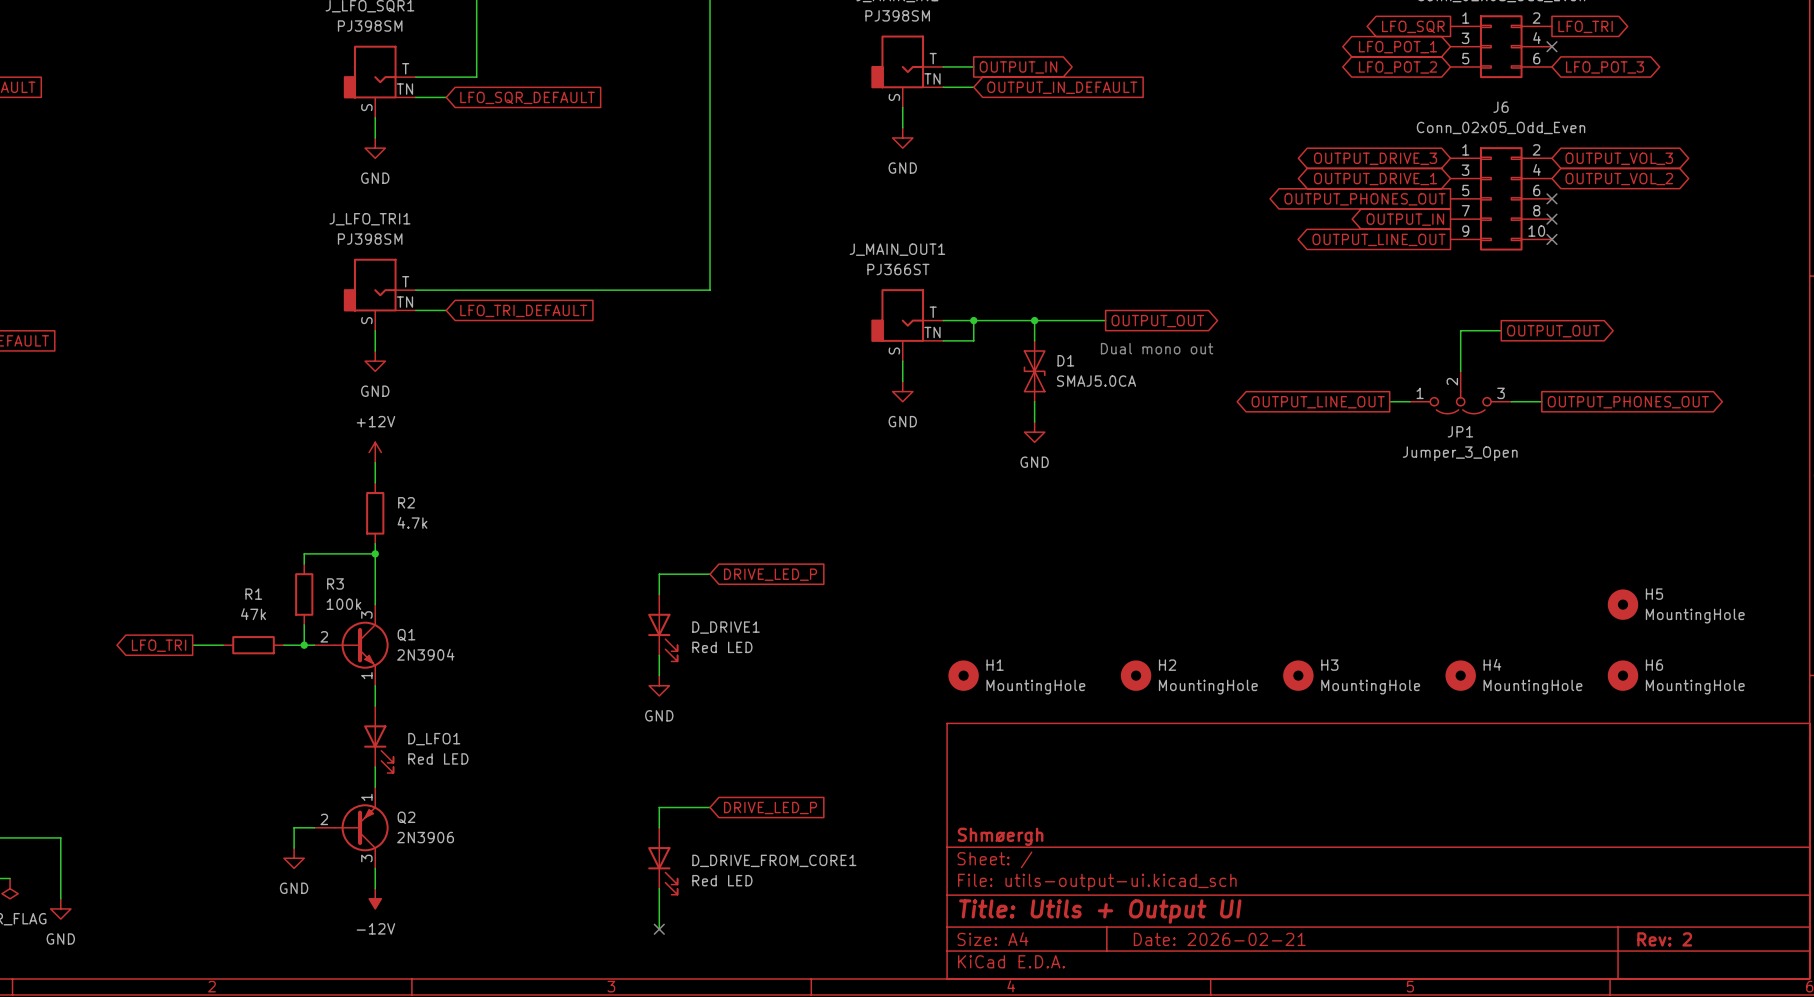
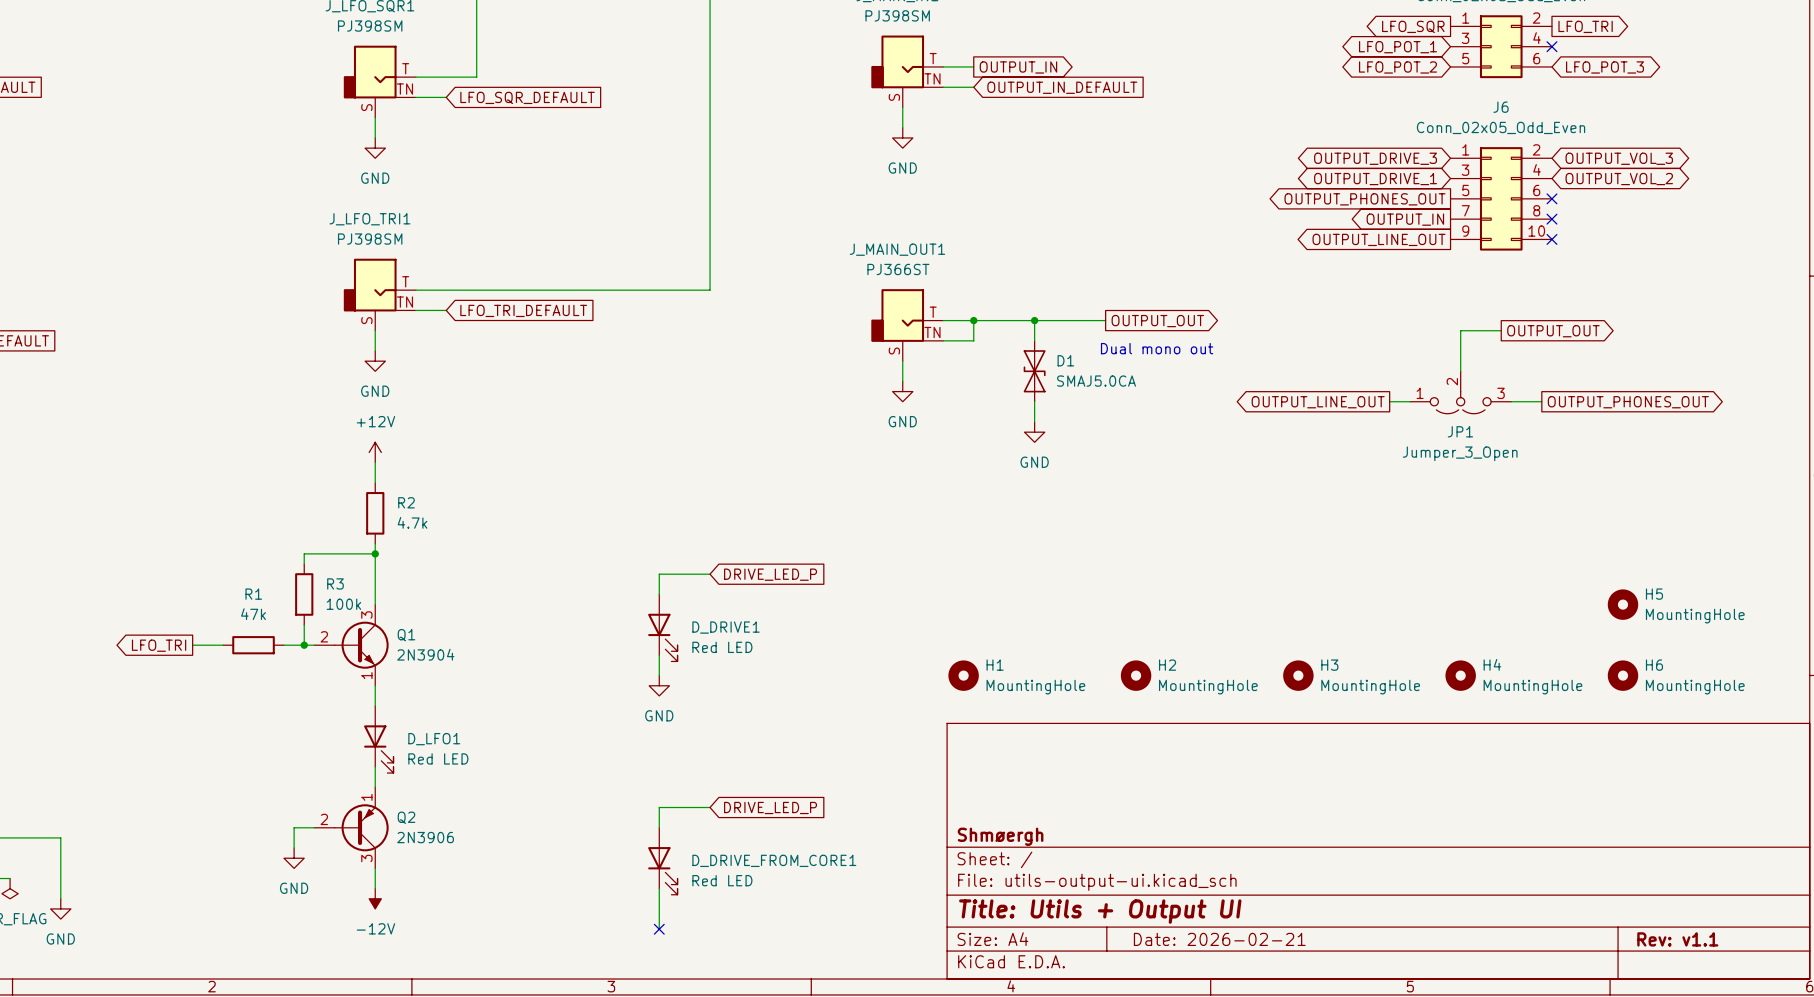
title block: Rev: 2 (1664, 939) -> Rev: v1.1 (1677, 939)

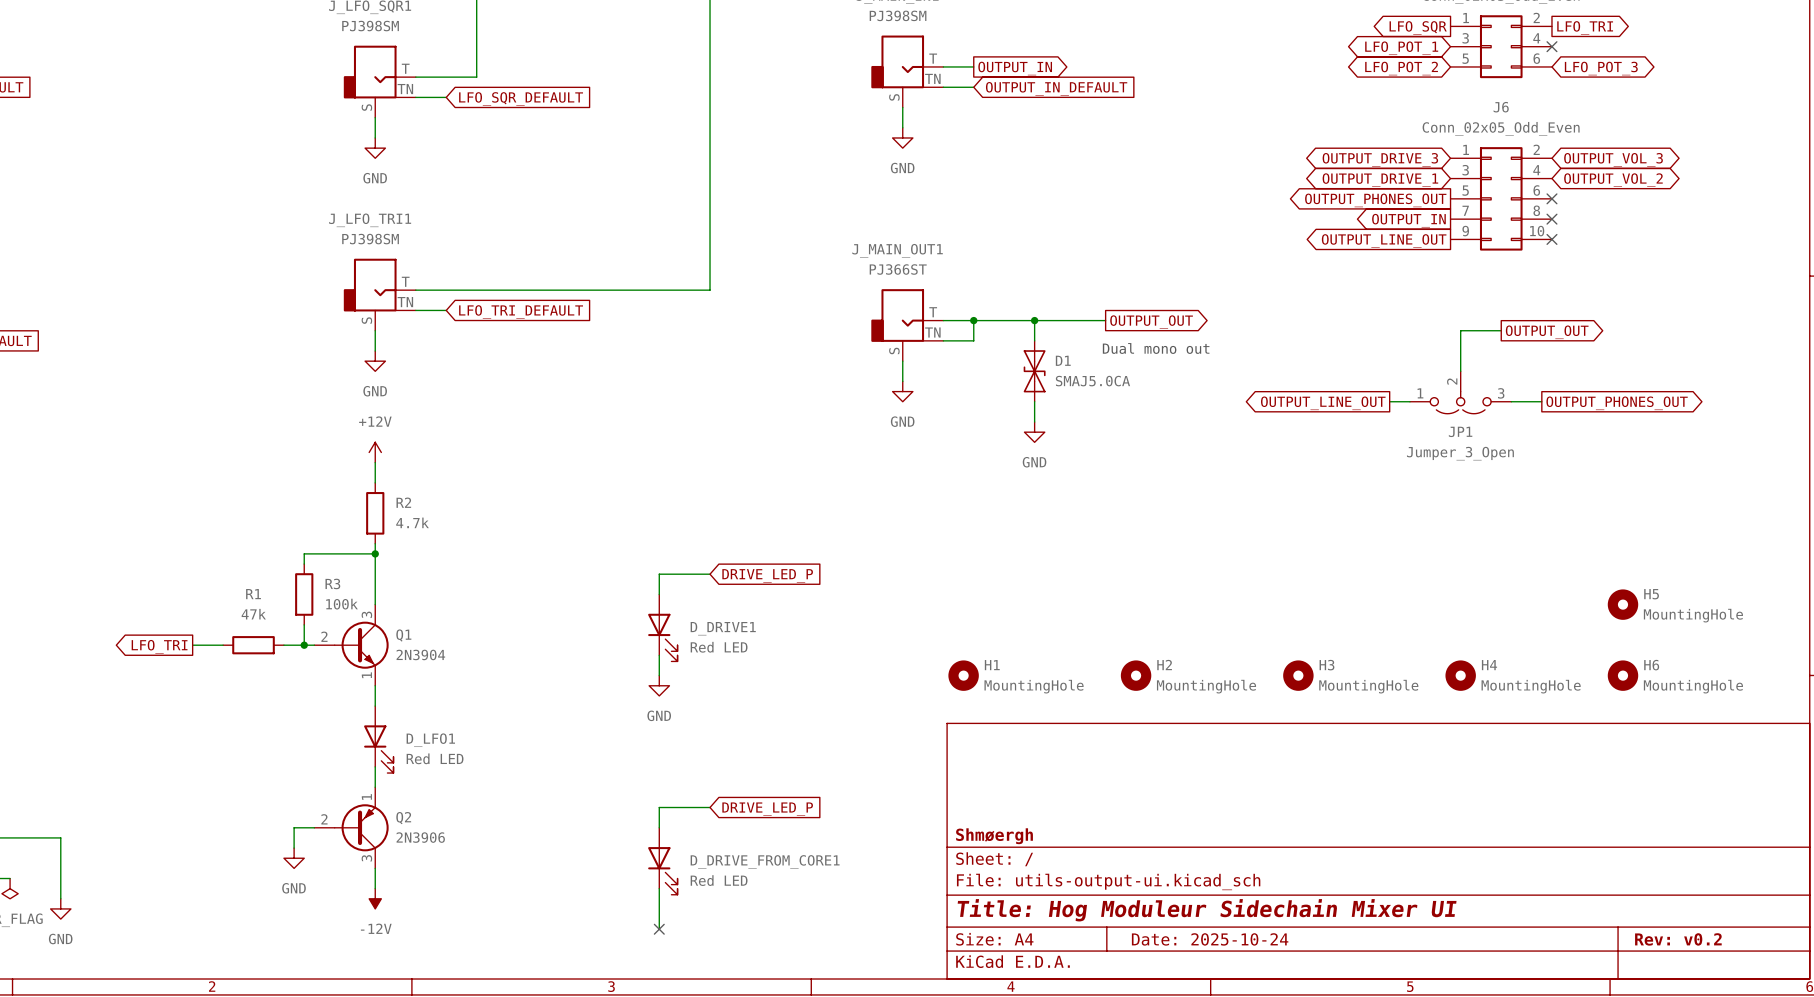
title block: Title: Utils + Output UI (1100, 911) -> Title: Hog Moduleur Sidechain Mixer UI (1207, 910)
title block: Date: 2026-02-21 (1219, 939) -> Date: 2025-10-24 (1210, 939)
title block: Rev: v1.1 (1677, 939) -> Rev: v0.2 (1678, 939)

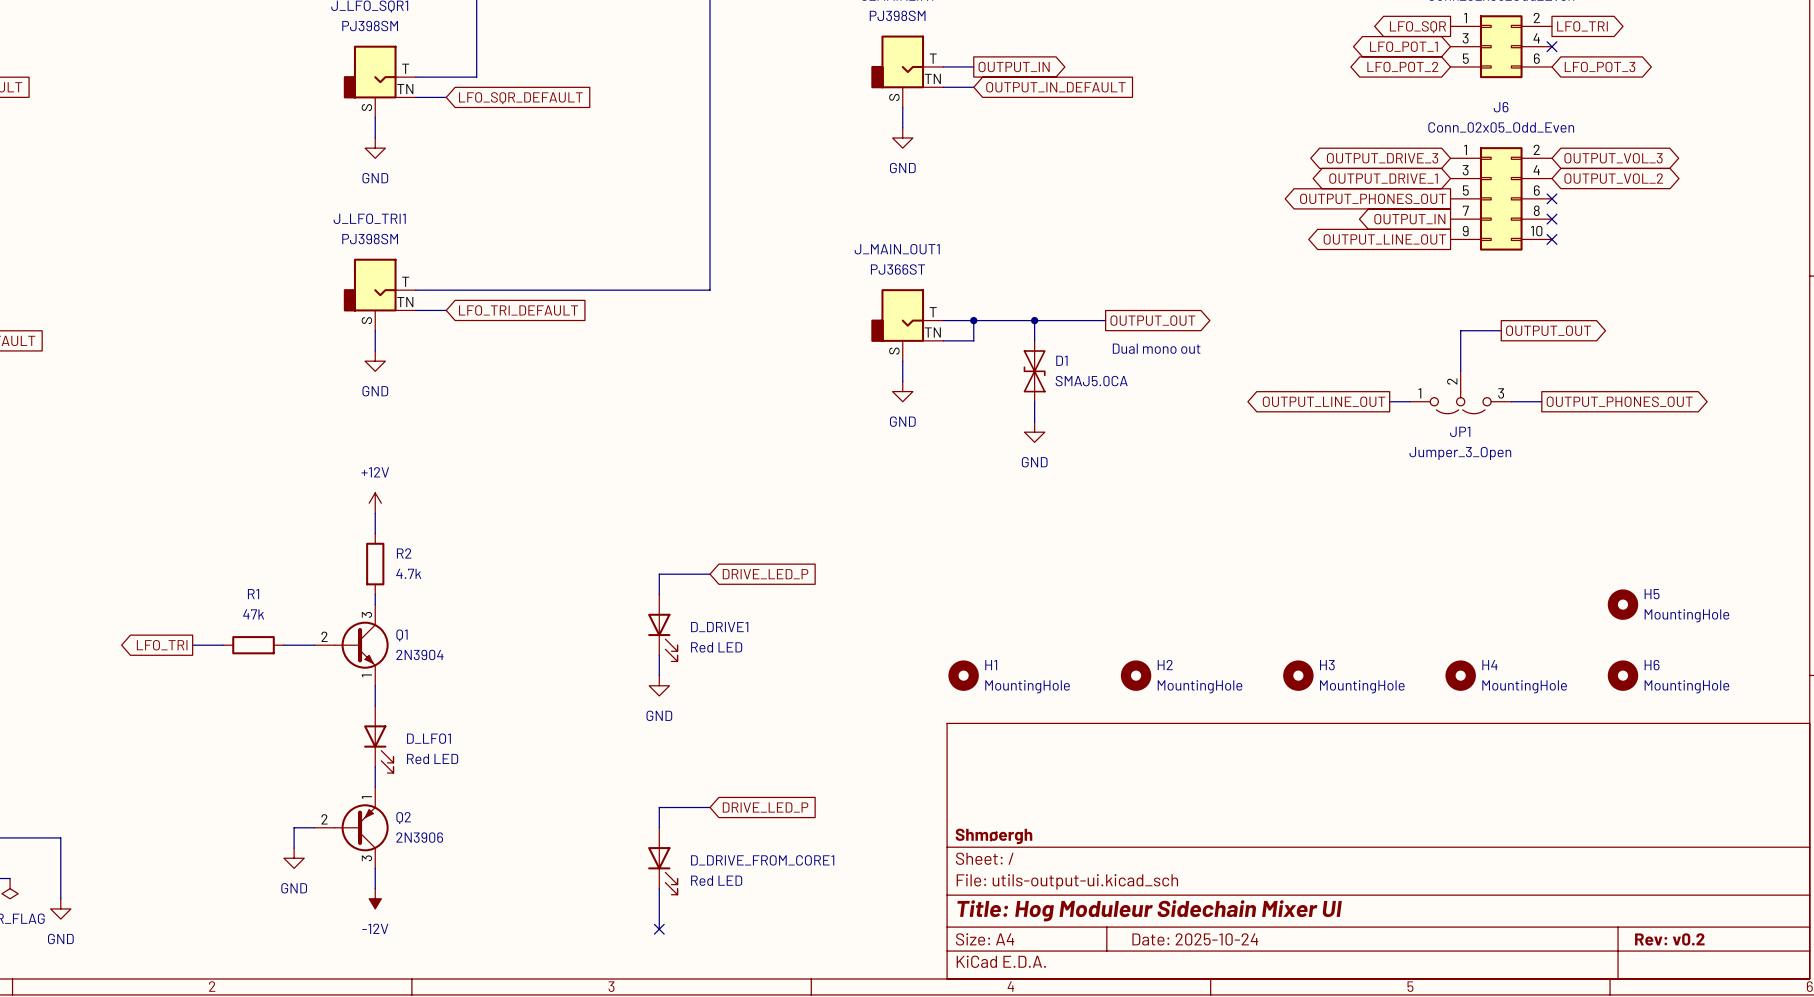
power symbol position: +12V (375, 452) -> +12V (375, 503)
wire: (375, 462) (375, 482) -> (375, 513) (375, 533)
R2 position: (375, 513) -> (375, 564)
wire: (375, 543) (375, 594) -> none
wire: (375, 553) (304, 553) (304, 564) -> none
junction: (375, 553) -> none
R3: 100k (304, 594) -> none
wire: (304, 624) (304, 645) -> none
junction: (304, 645) -> none

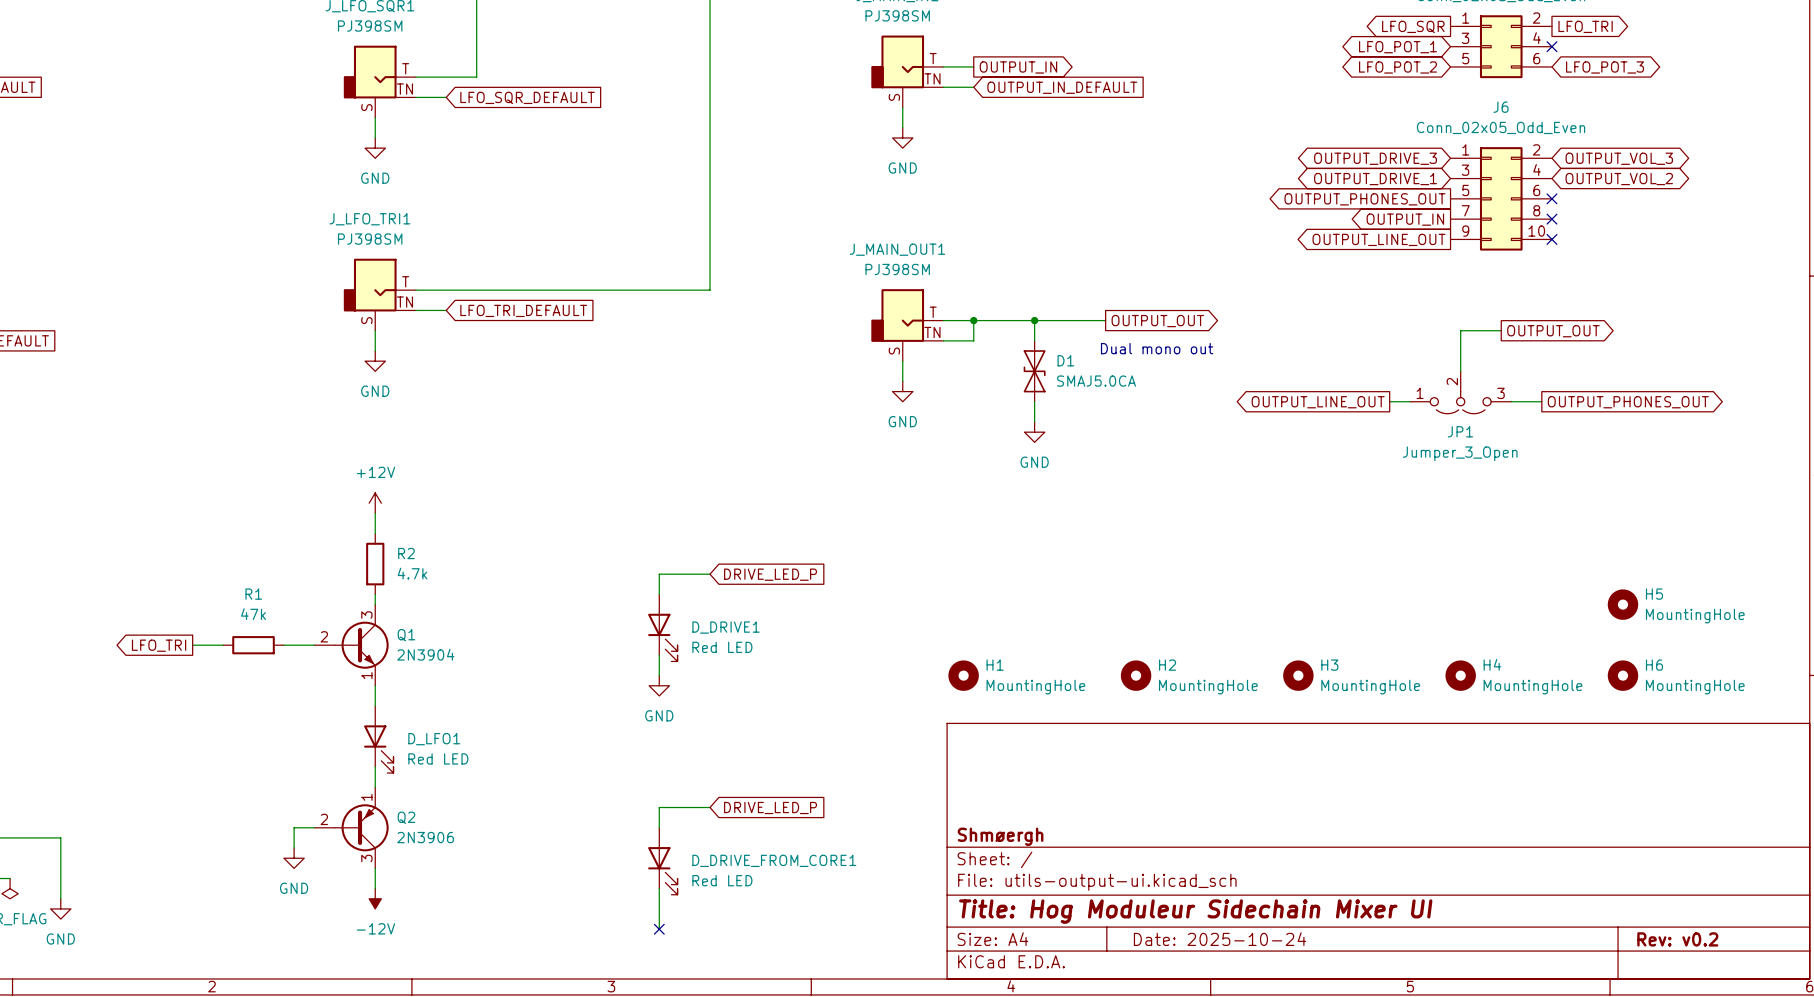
J_MAIN_OUT1 value: PJ366ST (897, 269) -> PJ398SM (897, 269)

